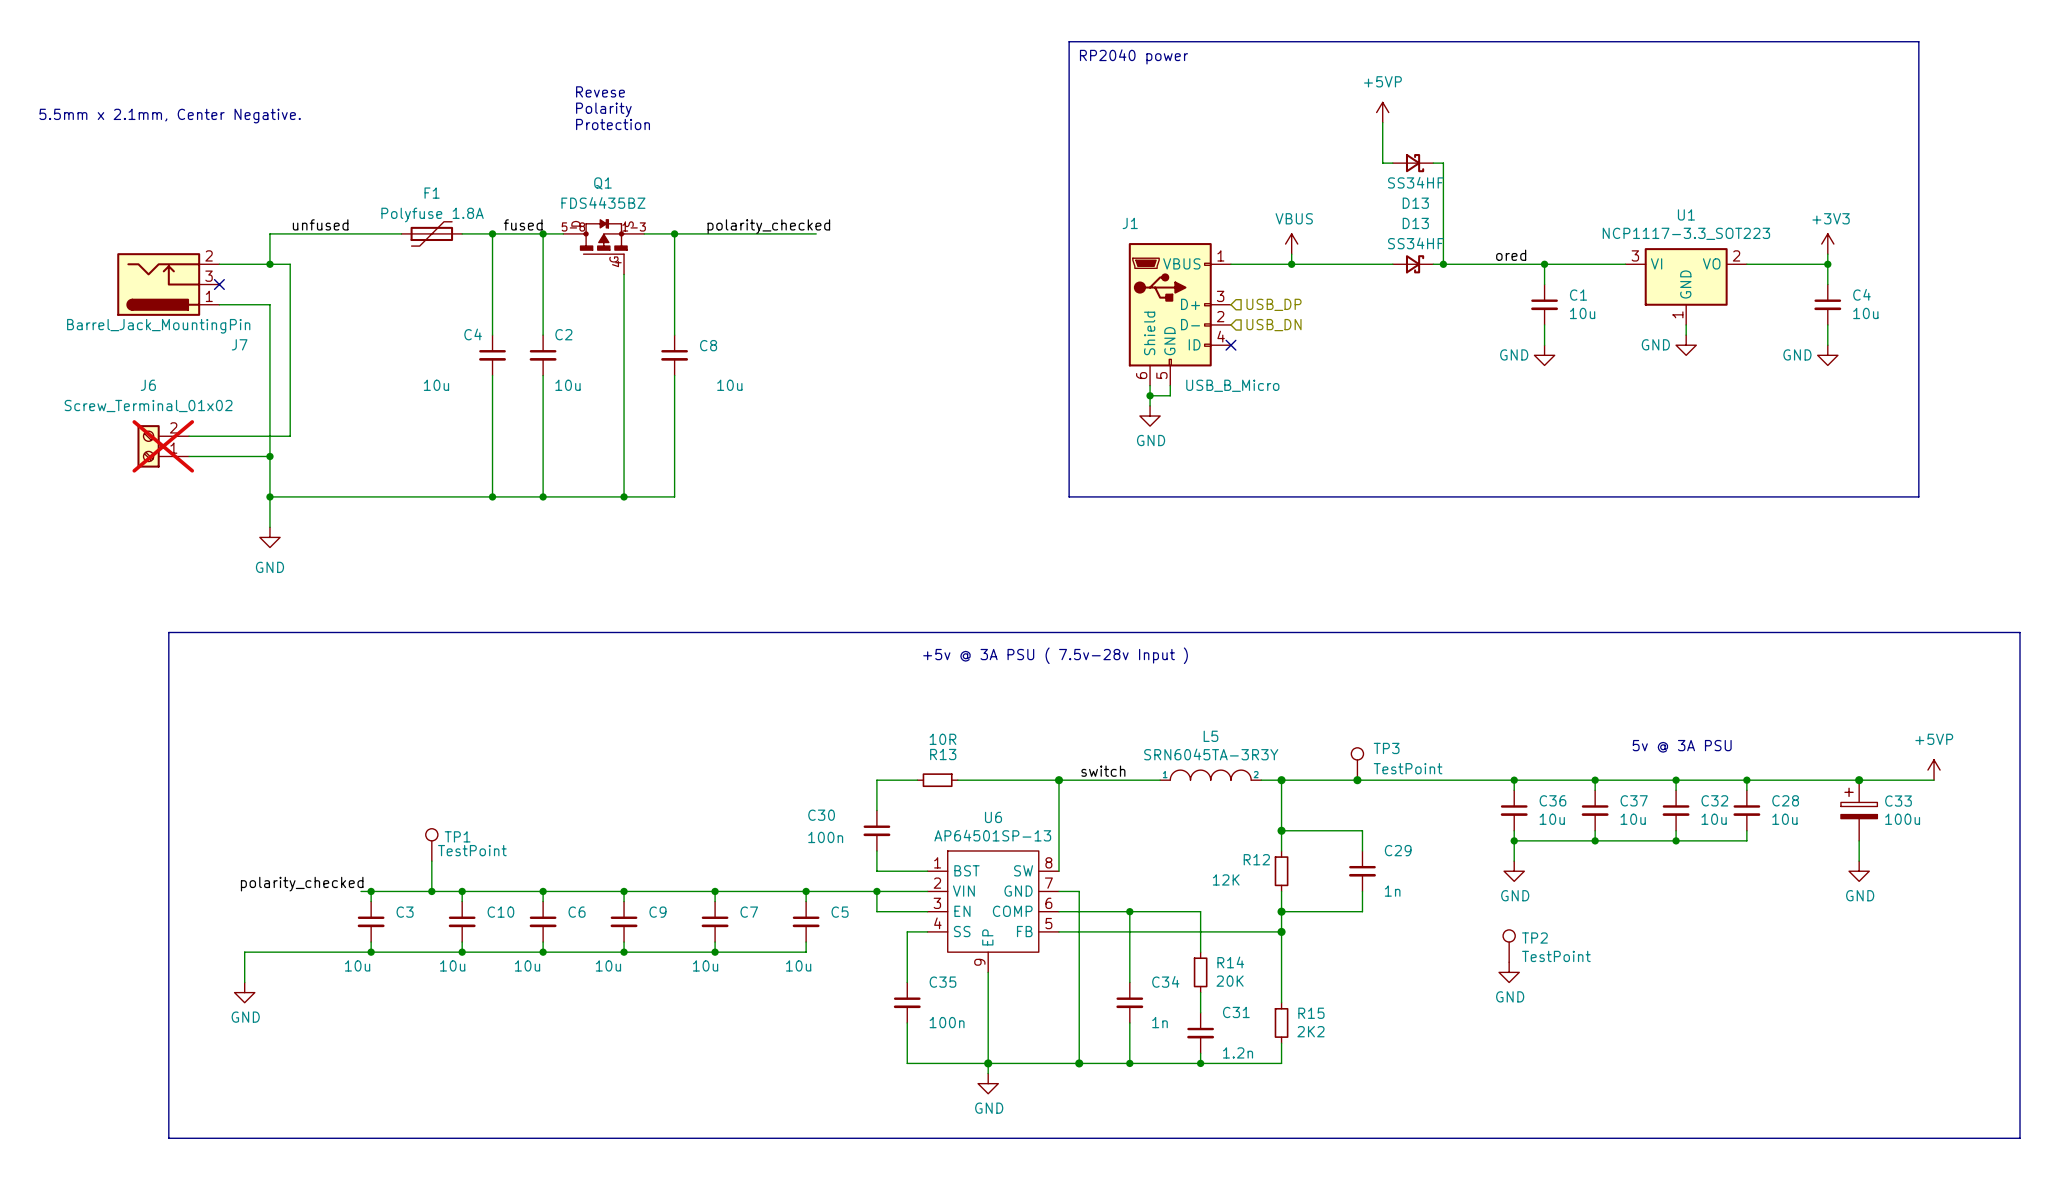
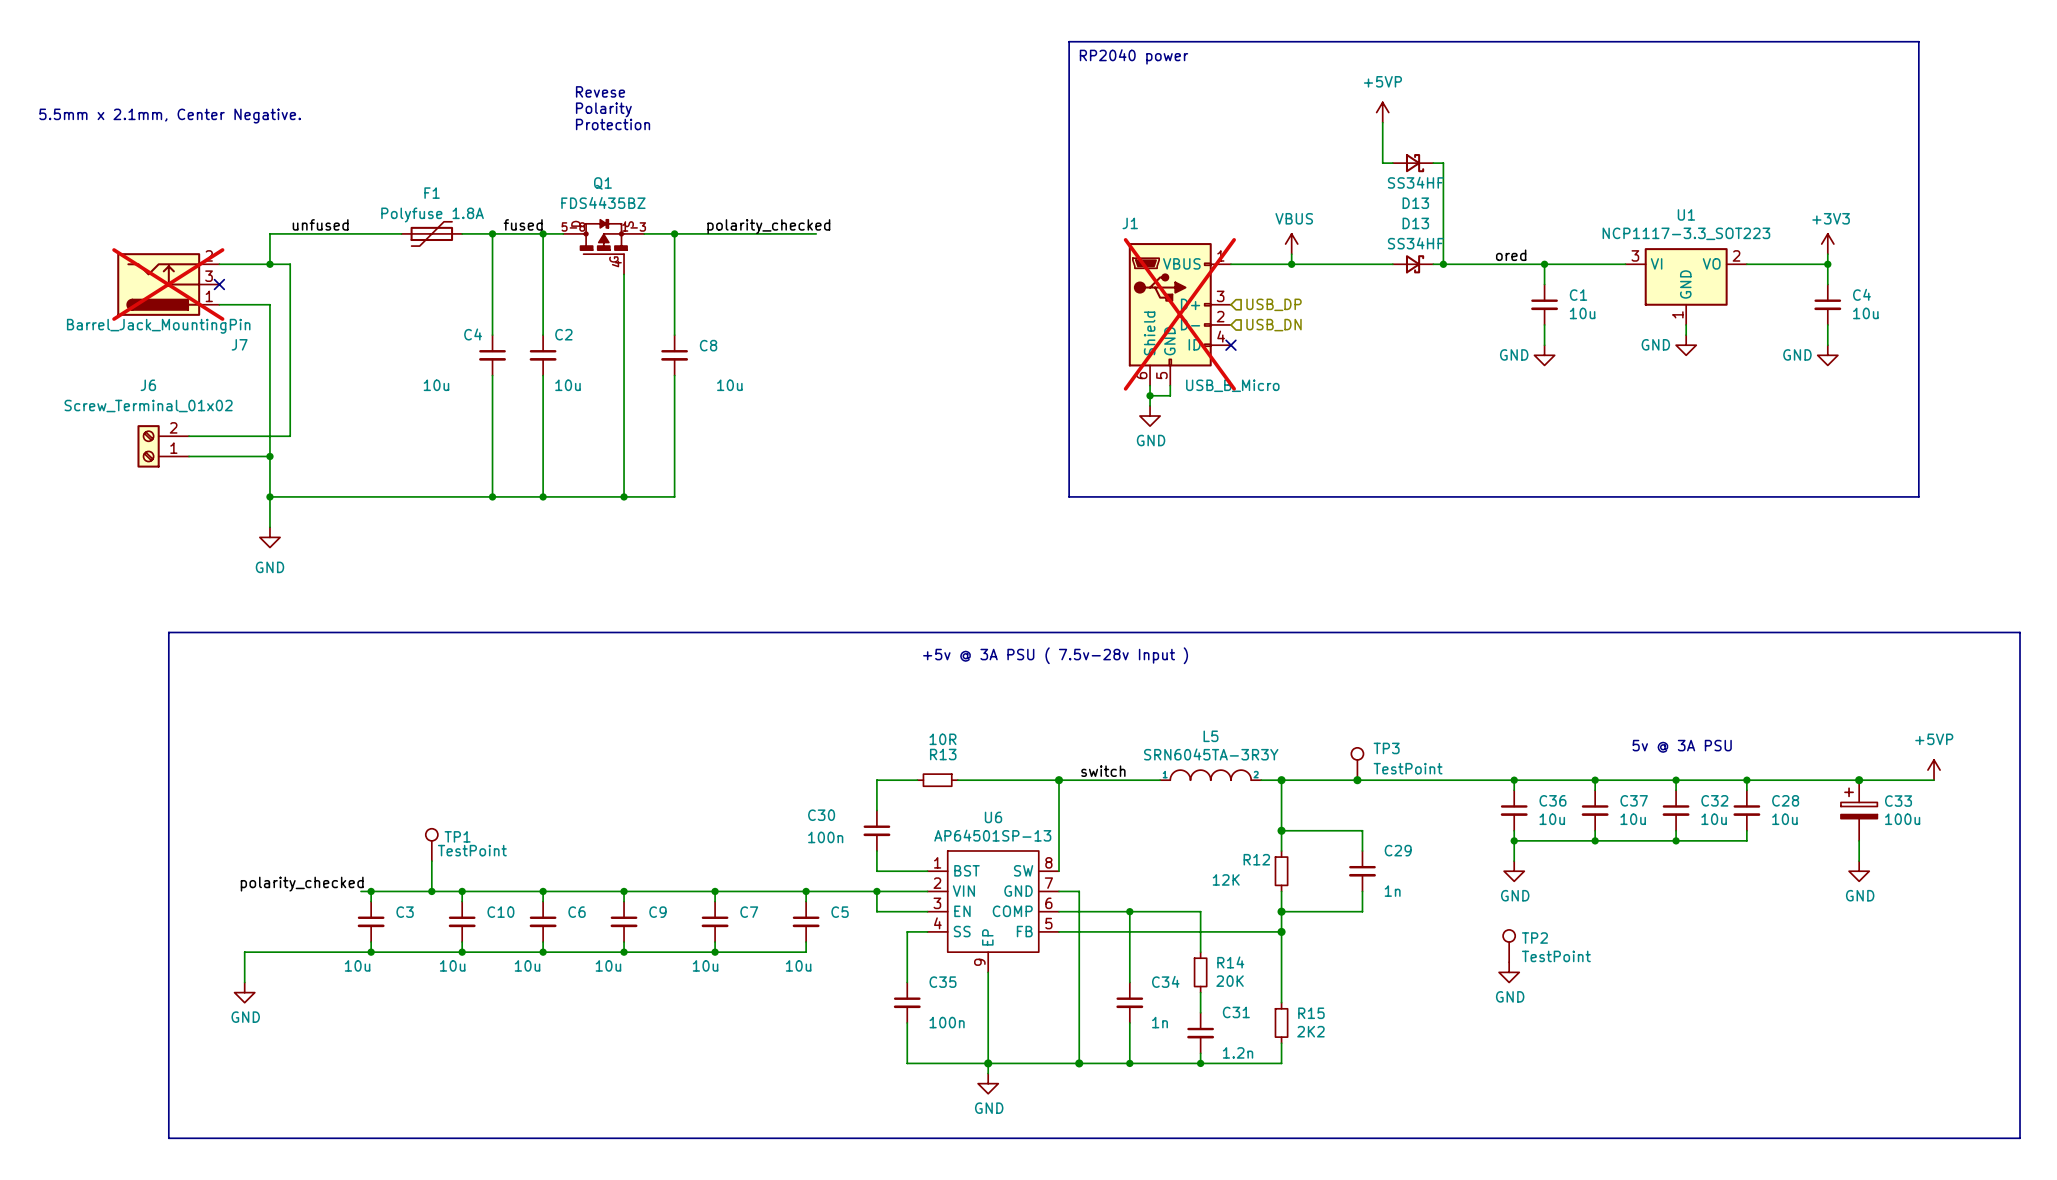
J7 do-not-place cross: none -> (168, 284)
J1 do-not-place cross: none -> (1179, 314)
J6 do-not-place cross: (163, 446) -> none

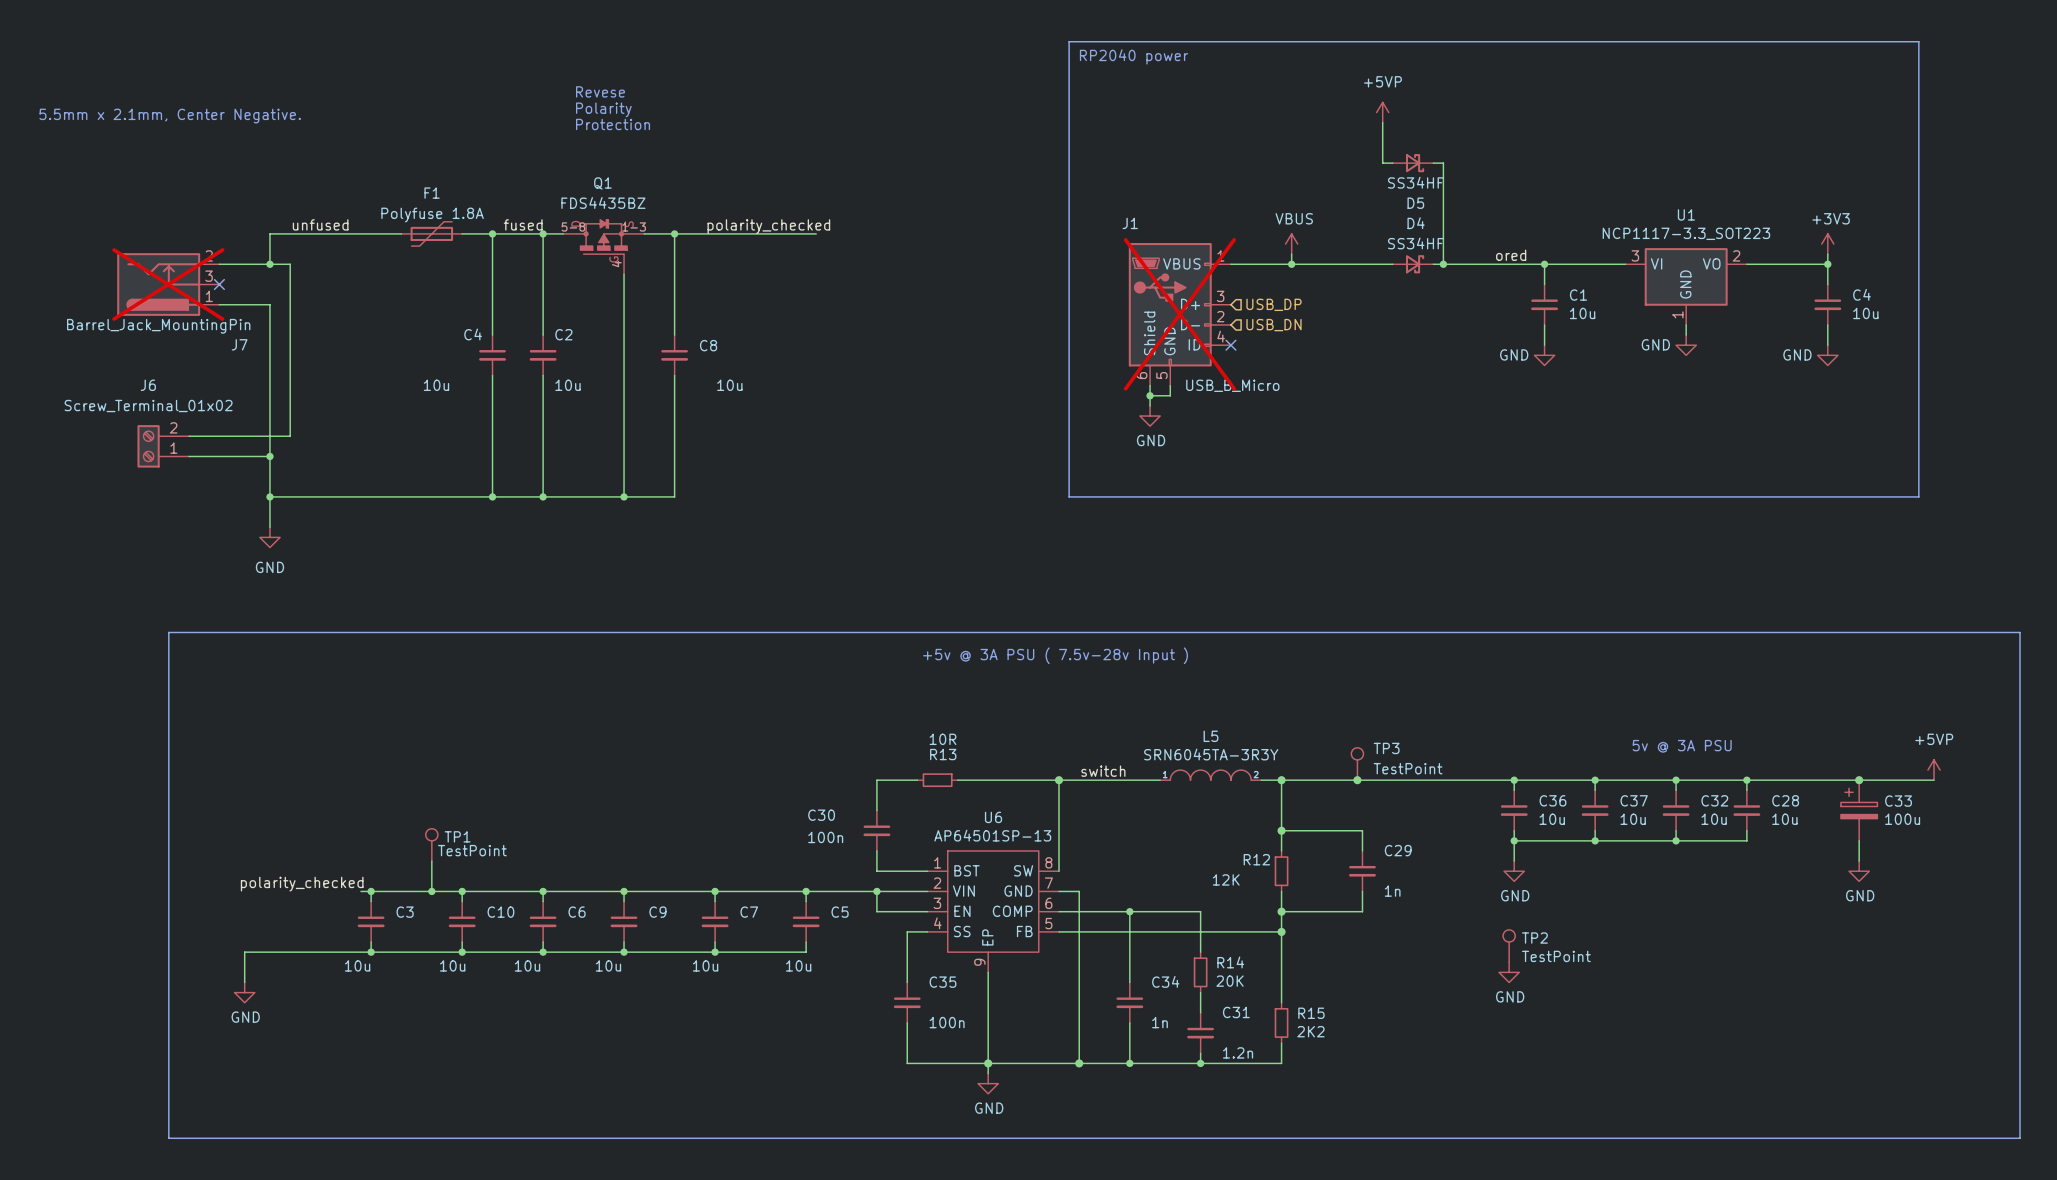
D13 name: D13 (1415, 203) -> D5 (1415, 203)
D13 name: D13 (1415, 223) -> D4 (1416, 223)

